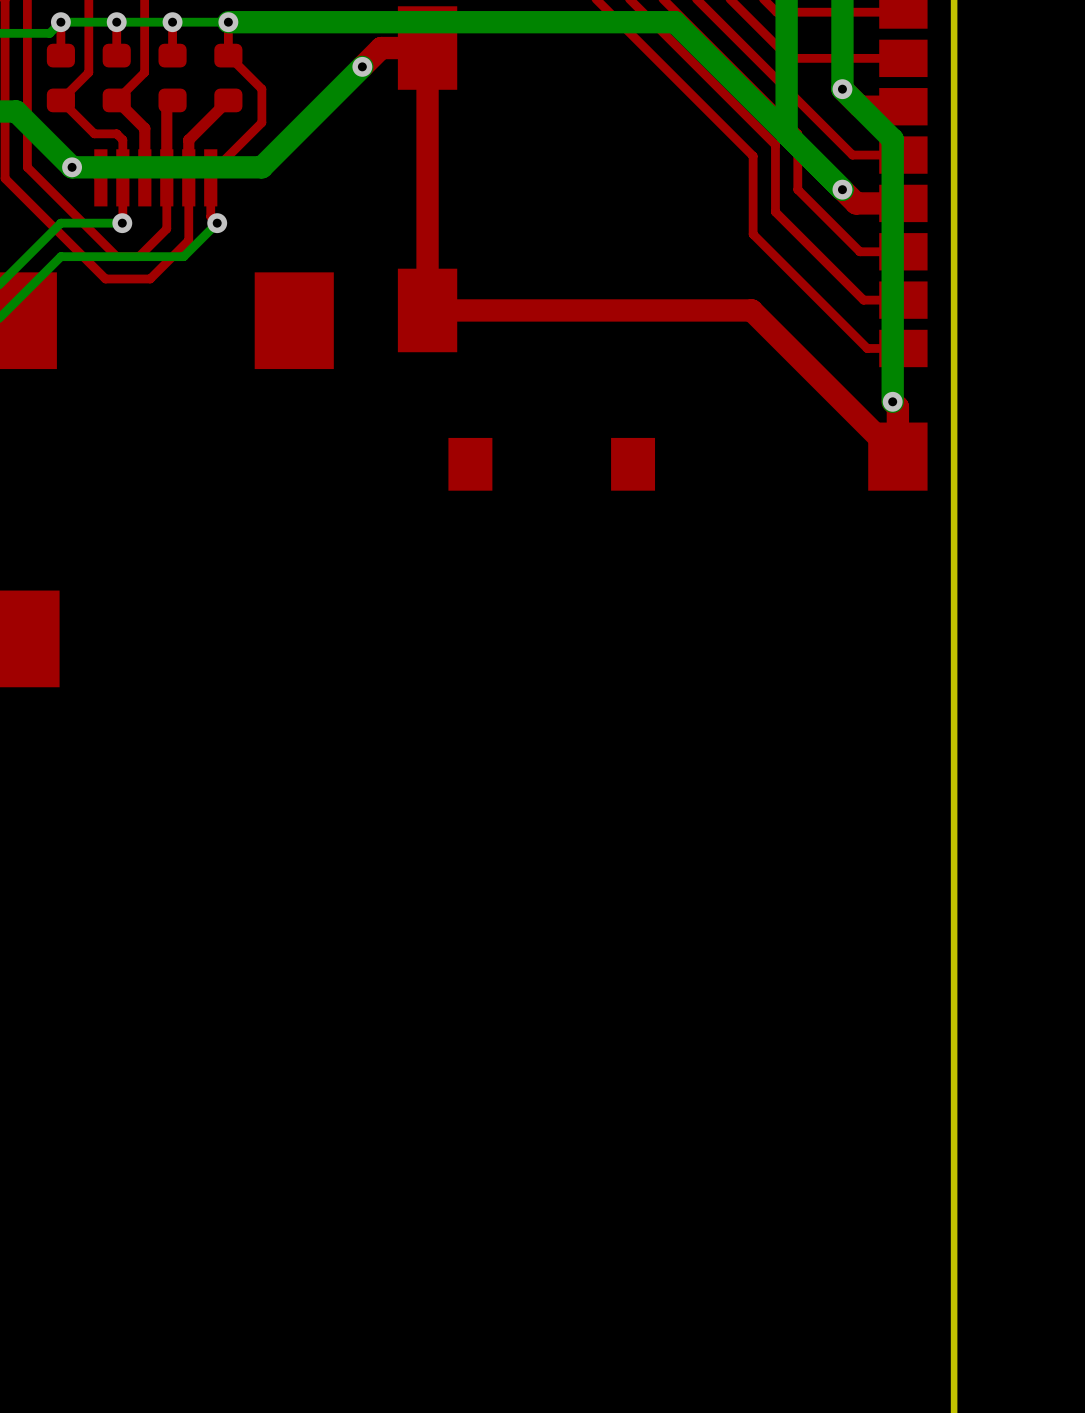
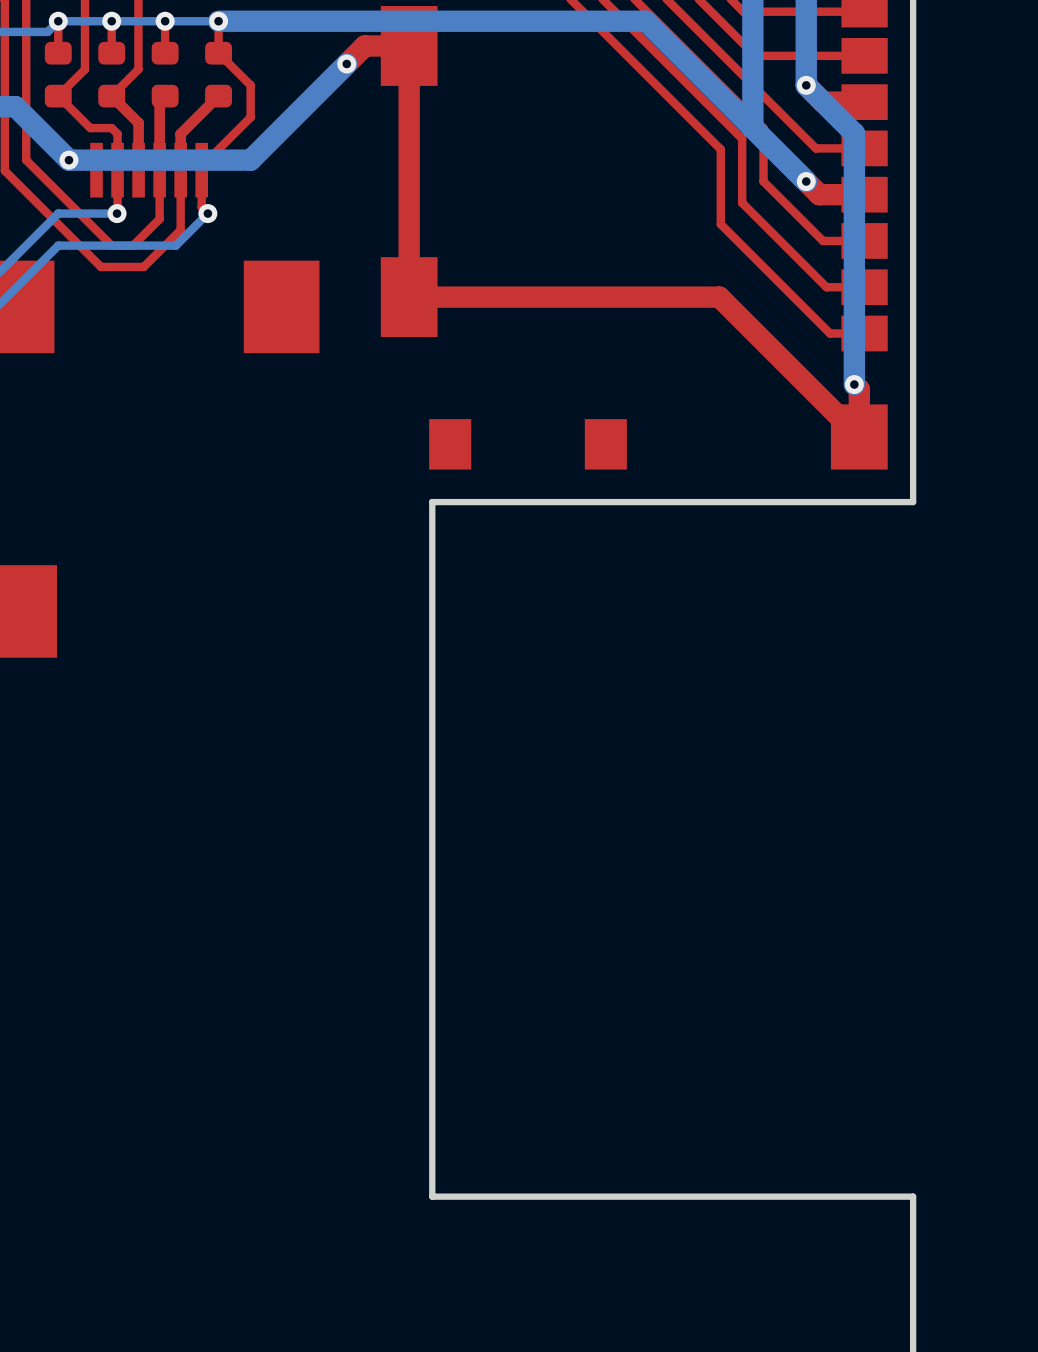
board edge: (954, 524) (954, 1250) -> (913, 502) (432, 502) (432, 1196) (913, 1196)

